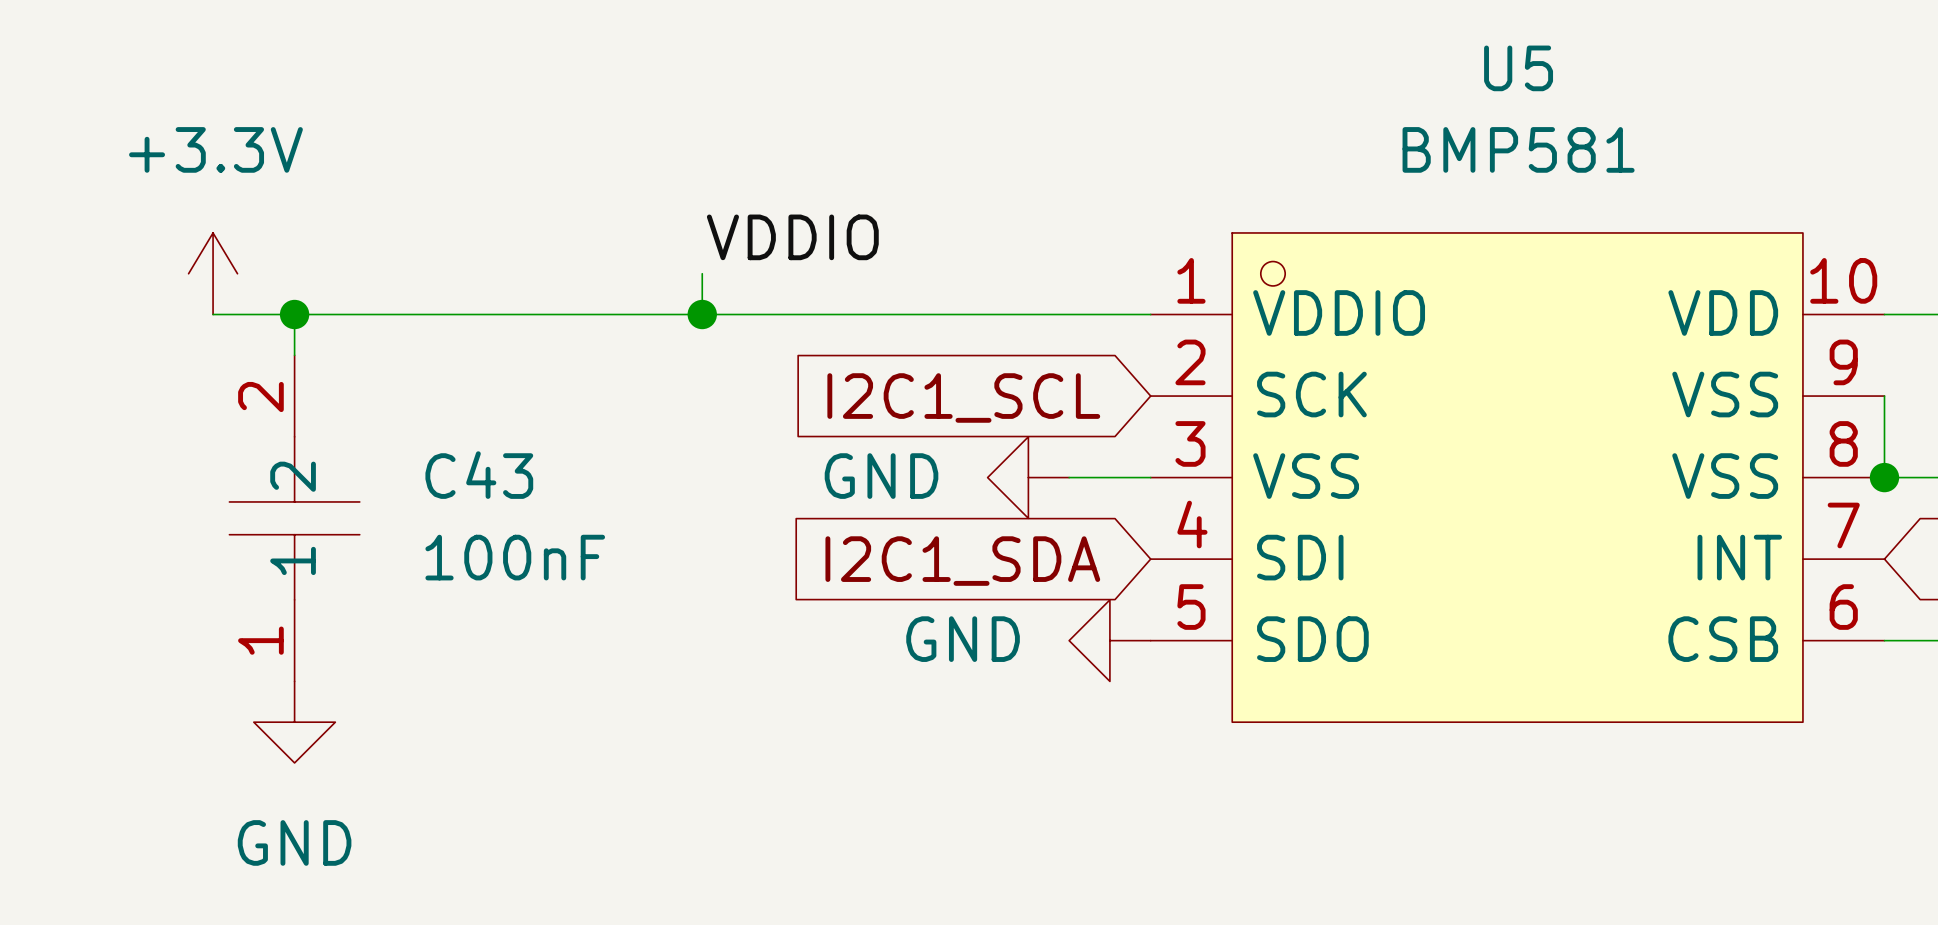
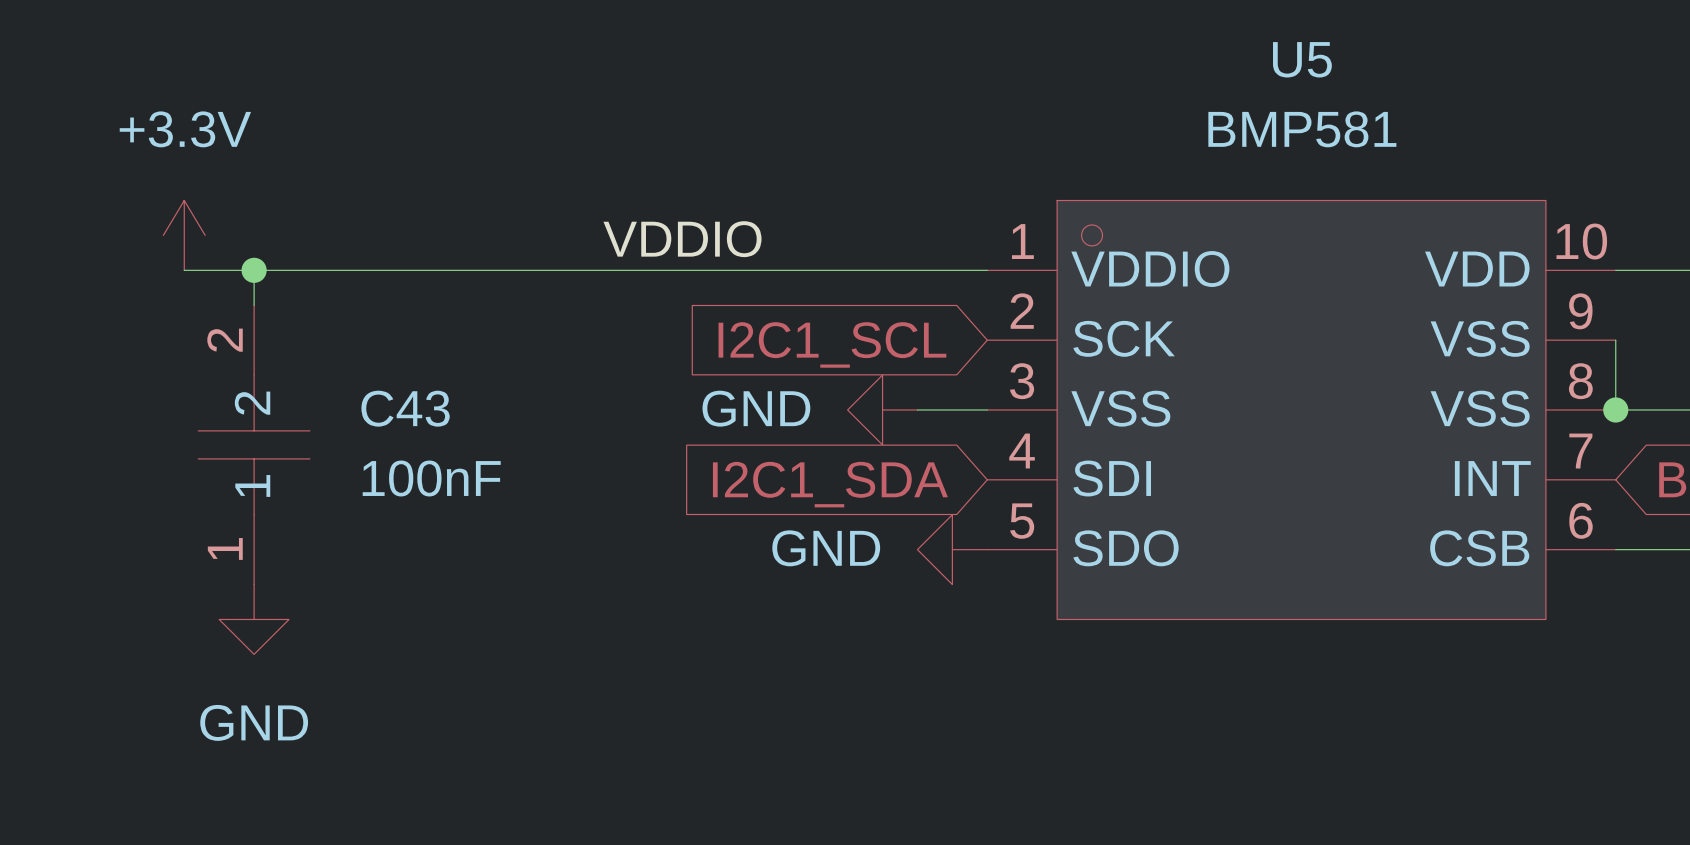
label position: VDDIO (792, 237) -> VDDIO (682, 239)
wire: (702, 273) (702, 314) -> none
junction: (702, 314) -> none

